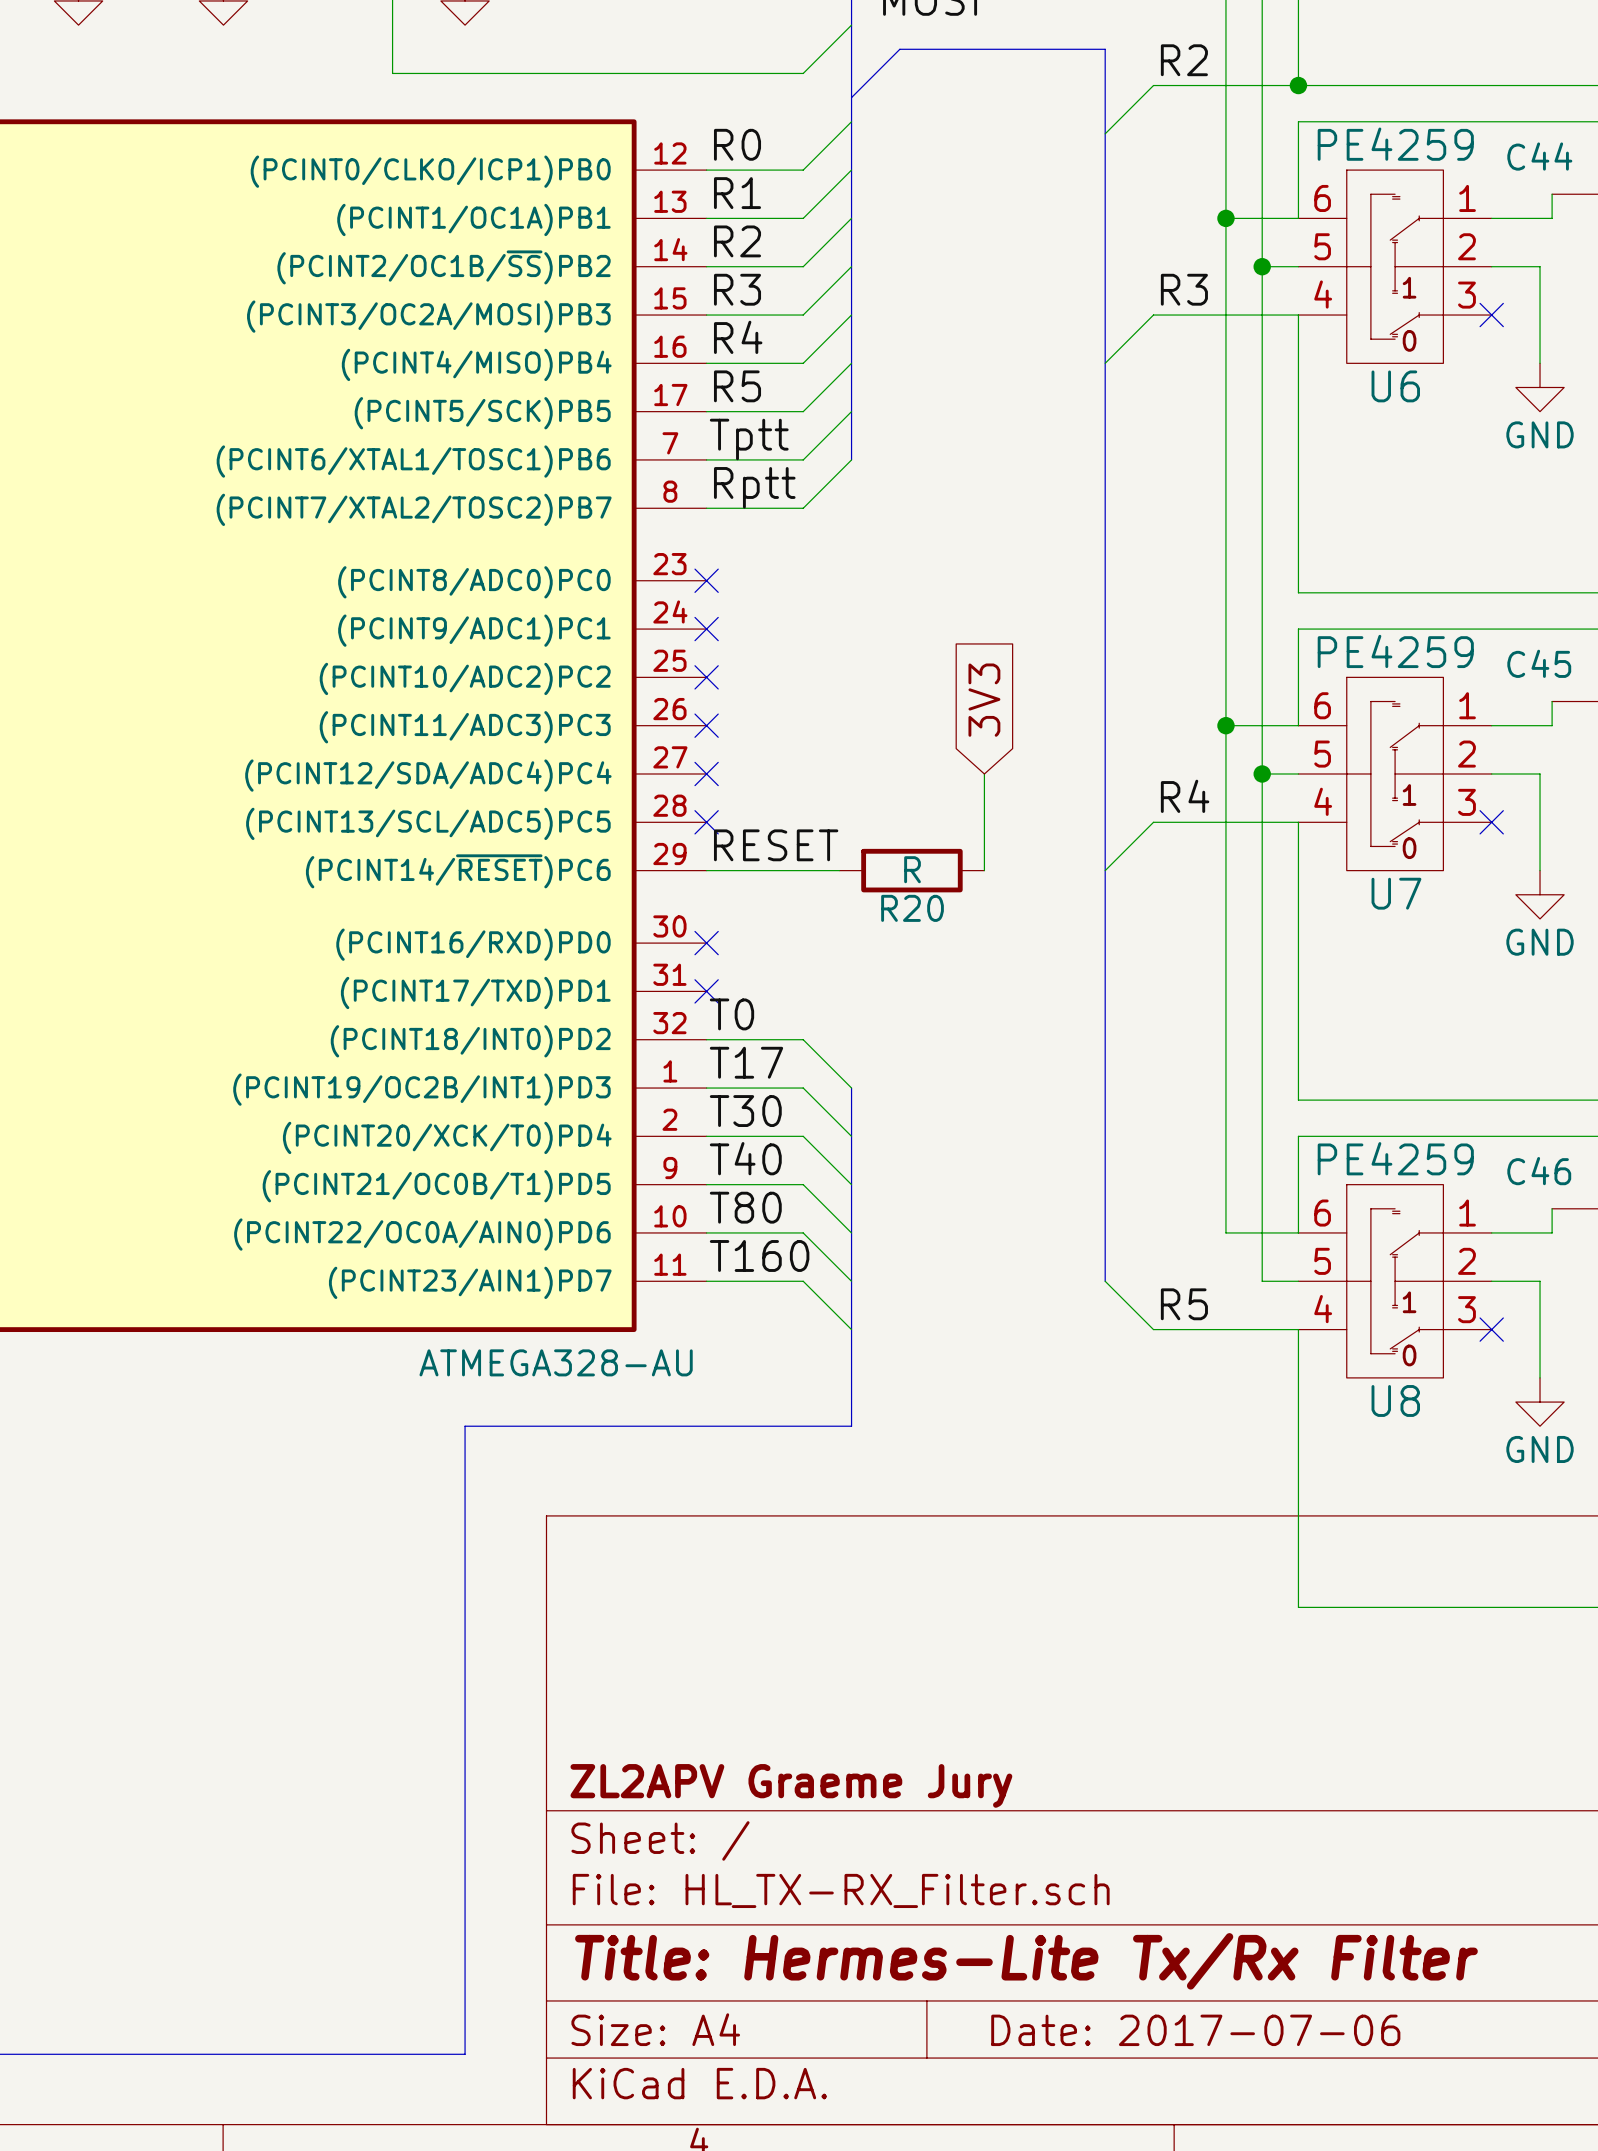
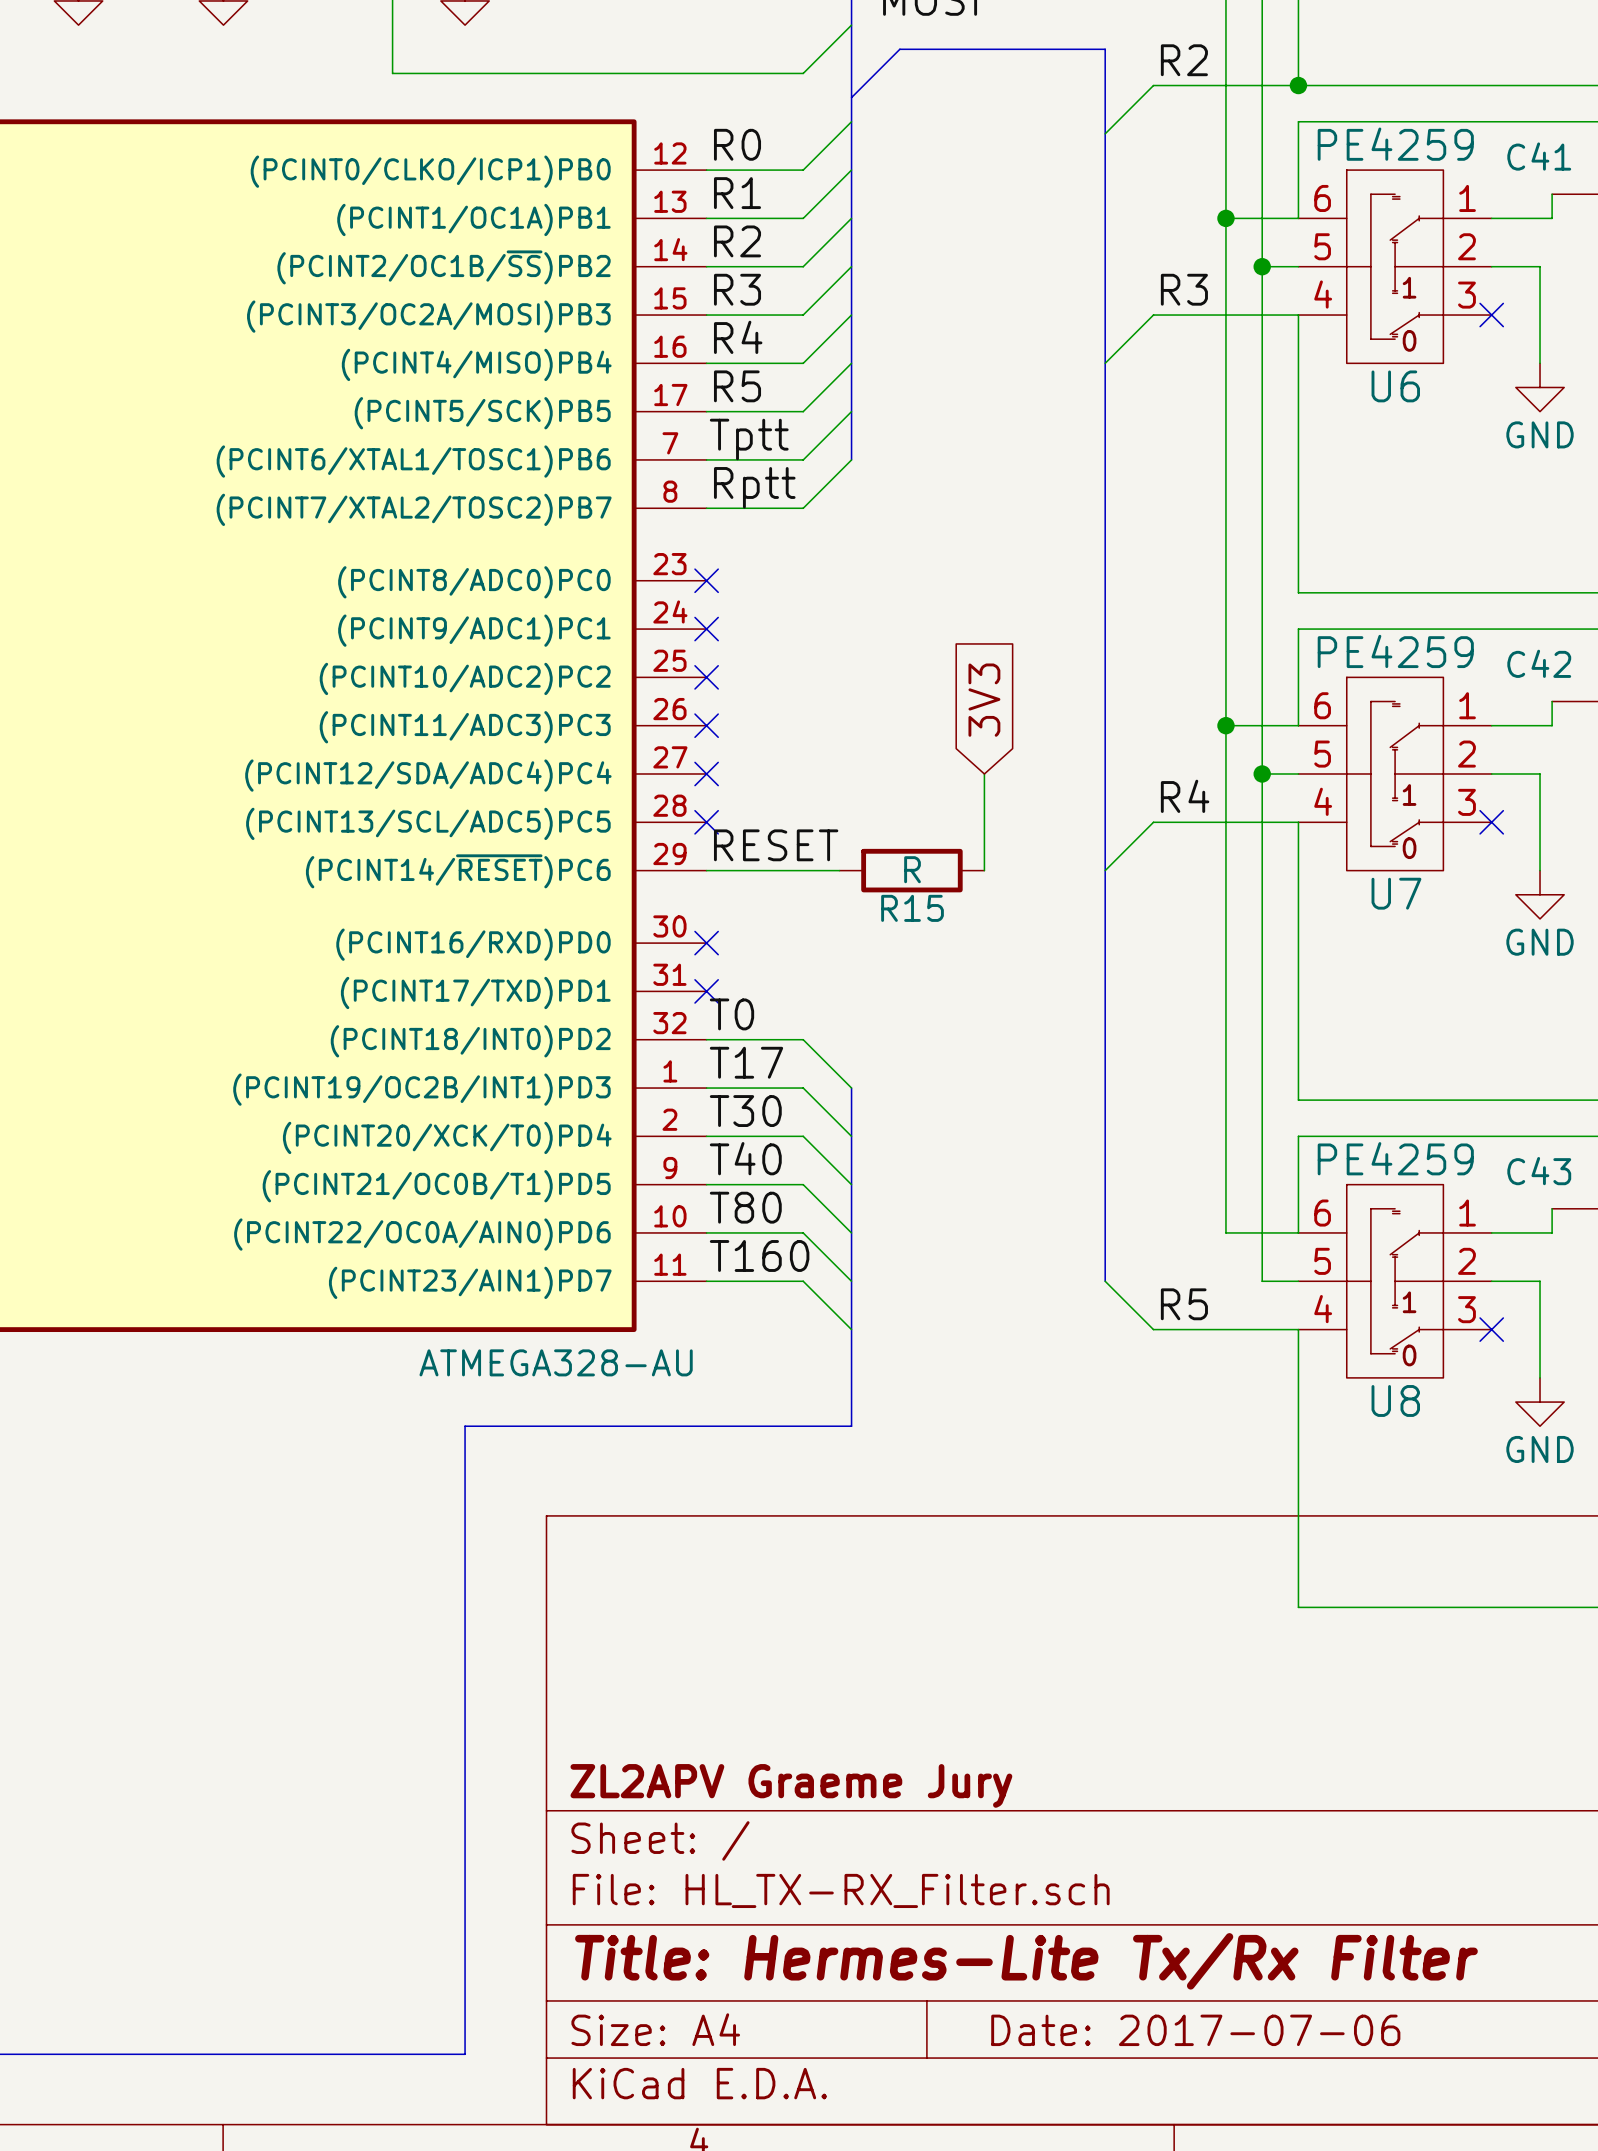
C44 name: C44 (1539, 156) -> C41 (1539, 156)
C45 name: C45 (1539, 663) -> C42 (1539, 663)
R20 name: R20 (912, 908) -> R15 (912, 908)
C46 name: C46 (1539, 1171) -> C43 (1539, 1171)

